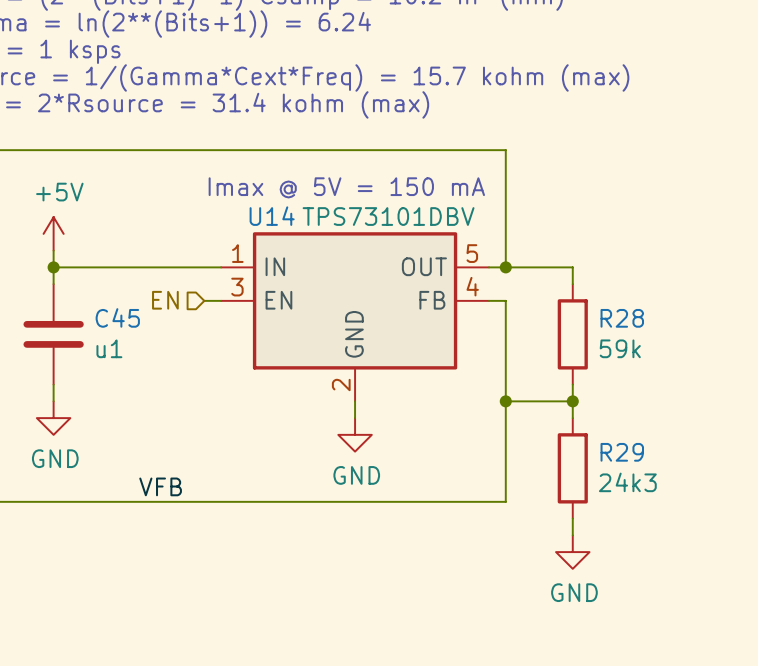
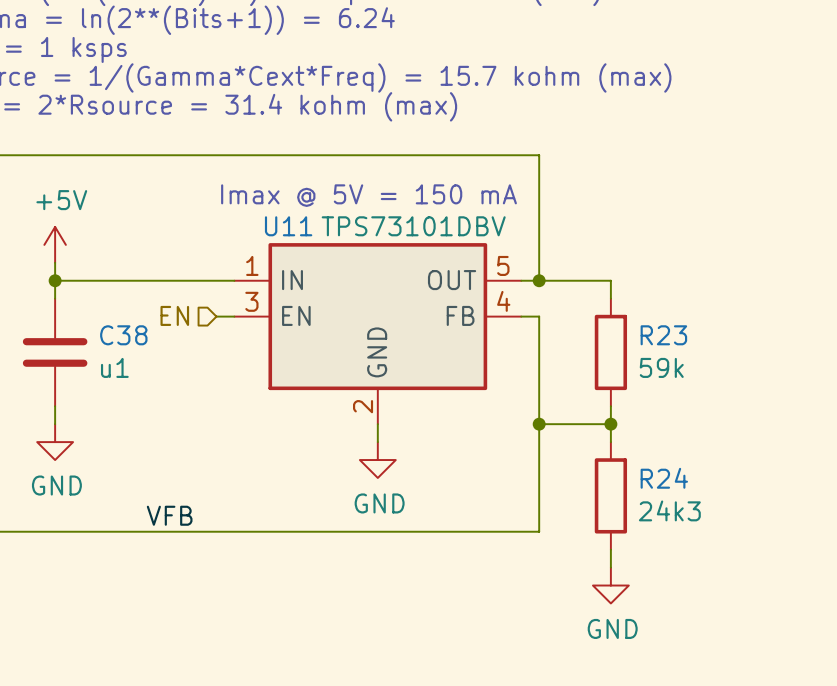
U14 name: U14 (272, 216) -> U11 (288, 226)
C45 name: C45 (117, 317) -> C38 (123, 335)
R28 name: R28 (622, 318) -> R23 (663, 335)
R29 name: R29 (622, 452) -> R24 (664, 478)

